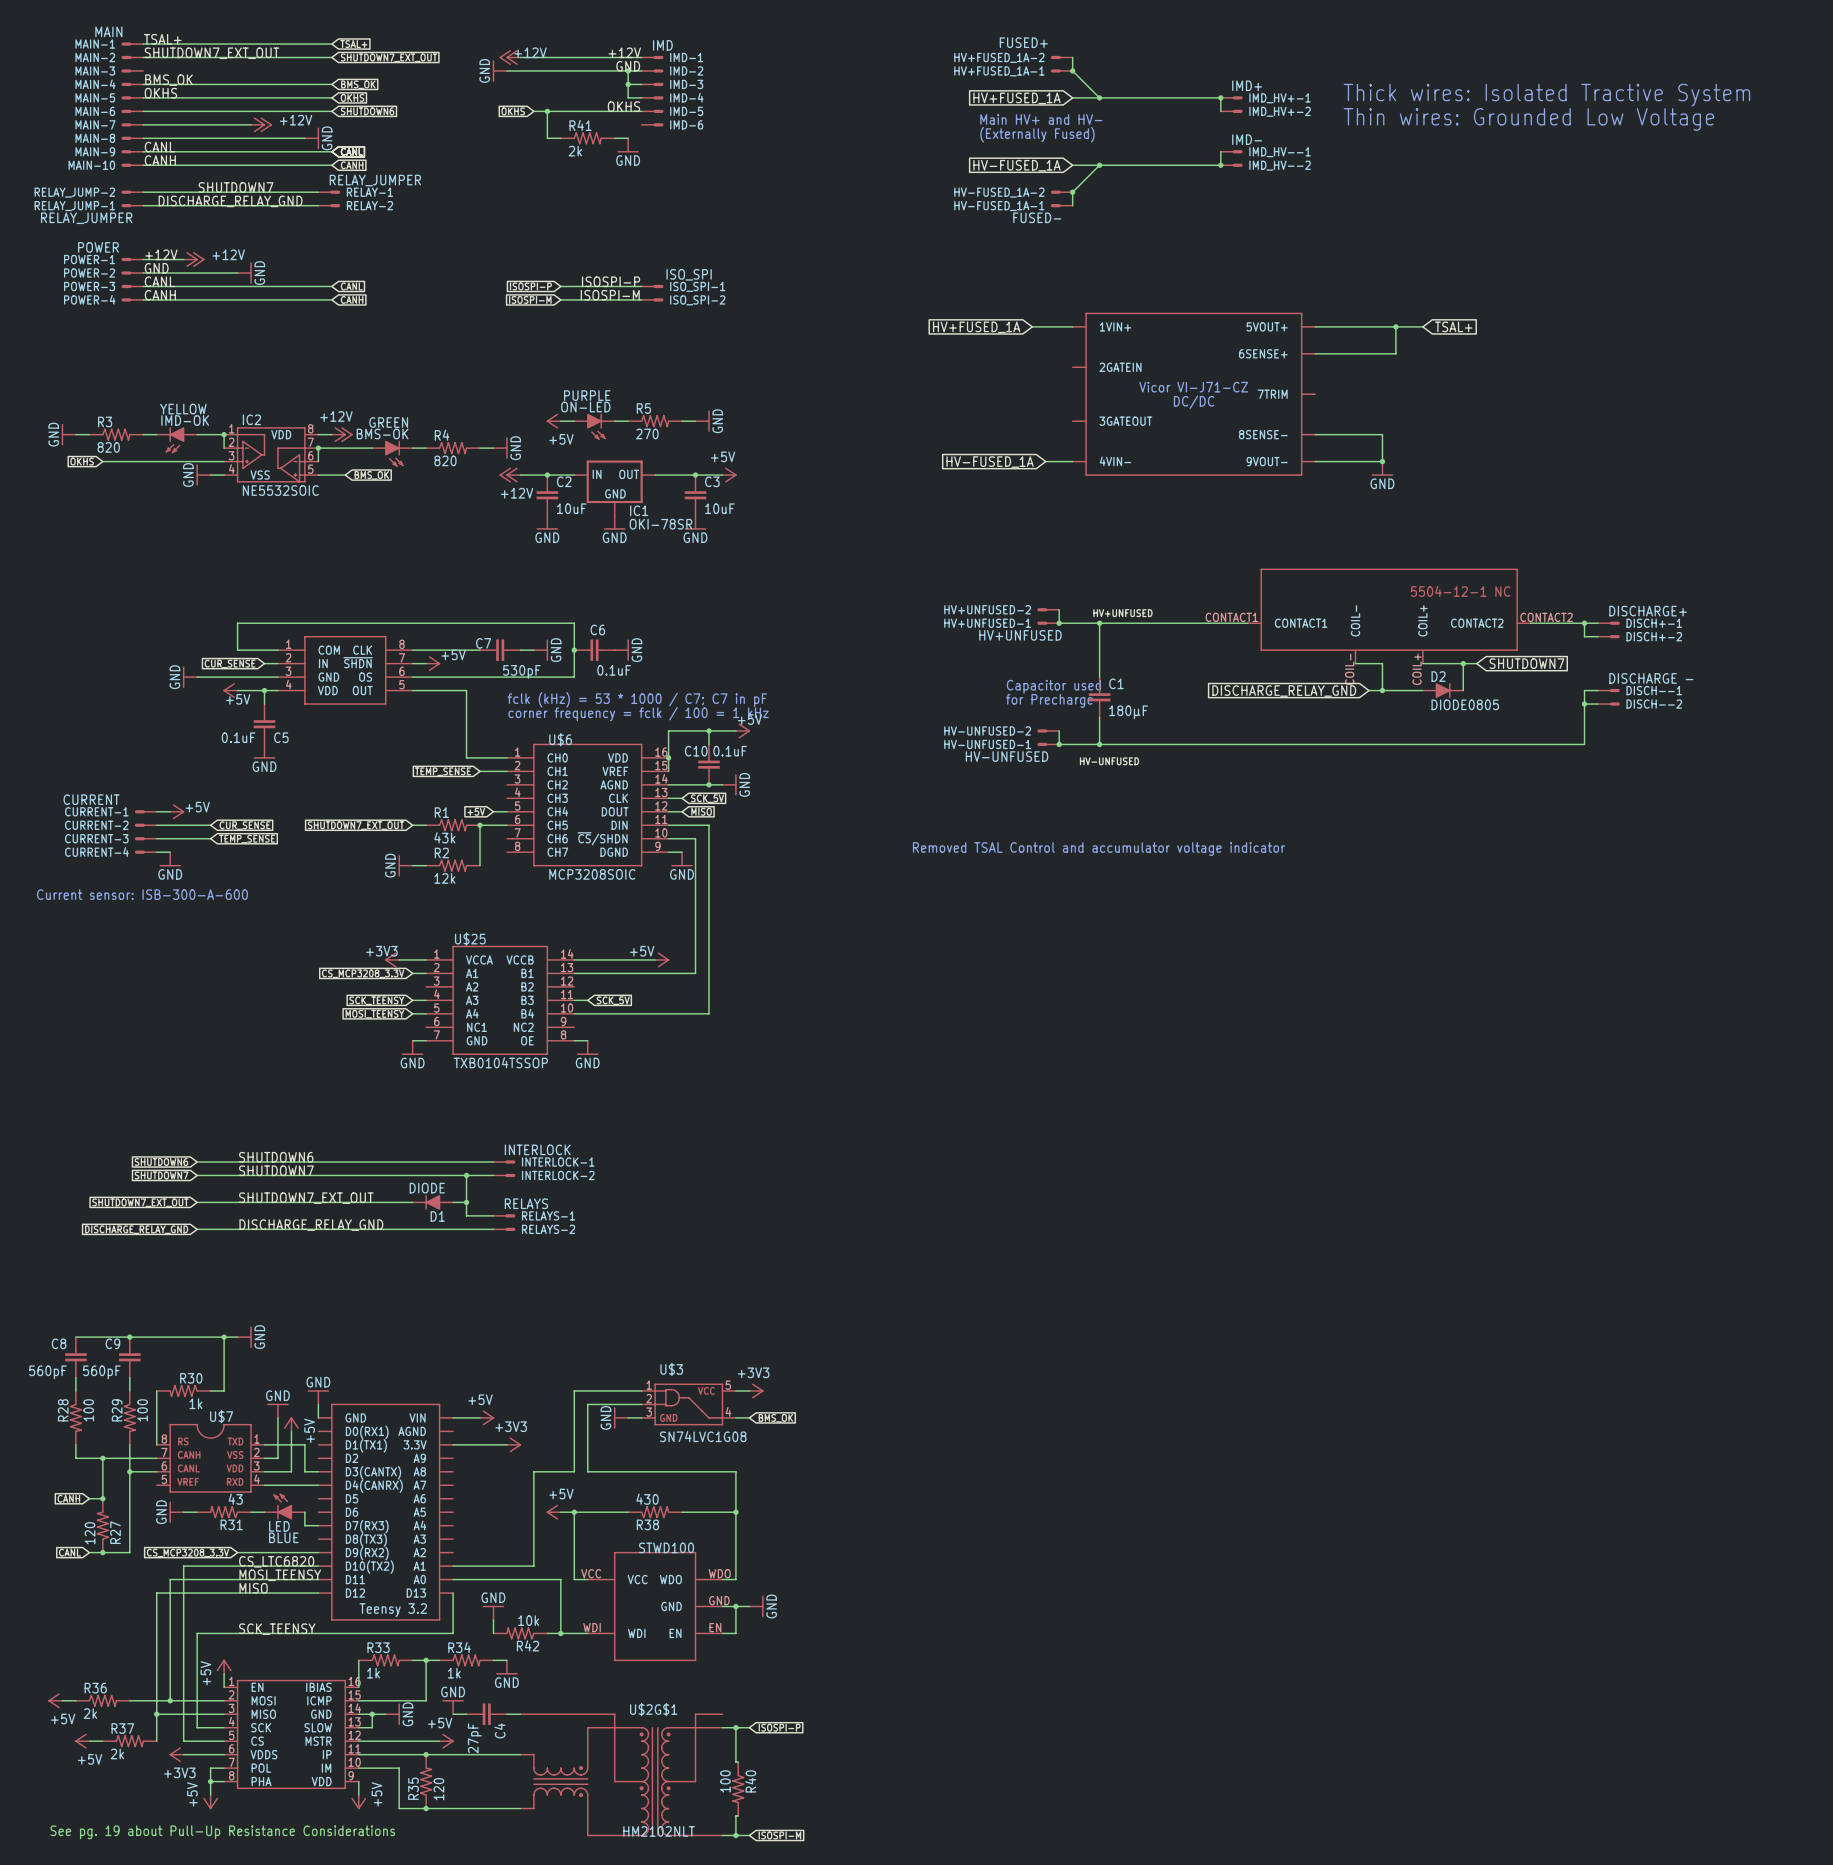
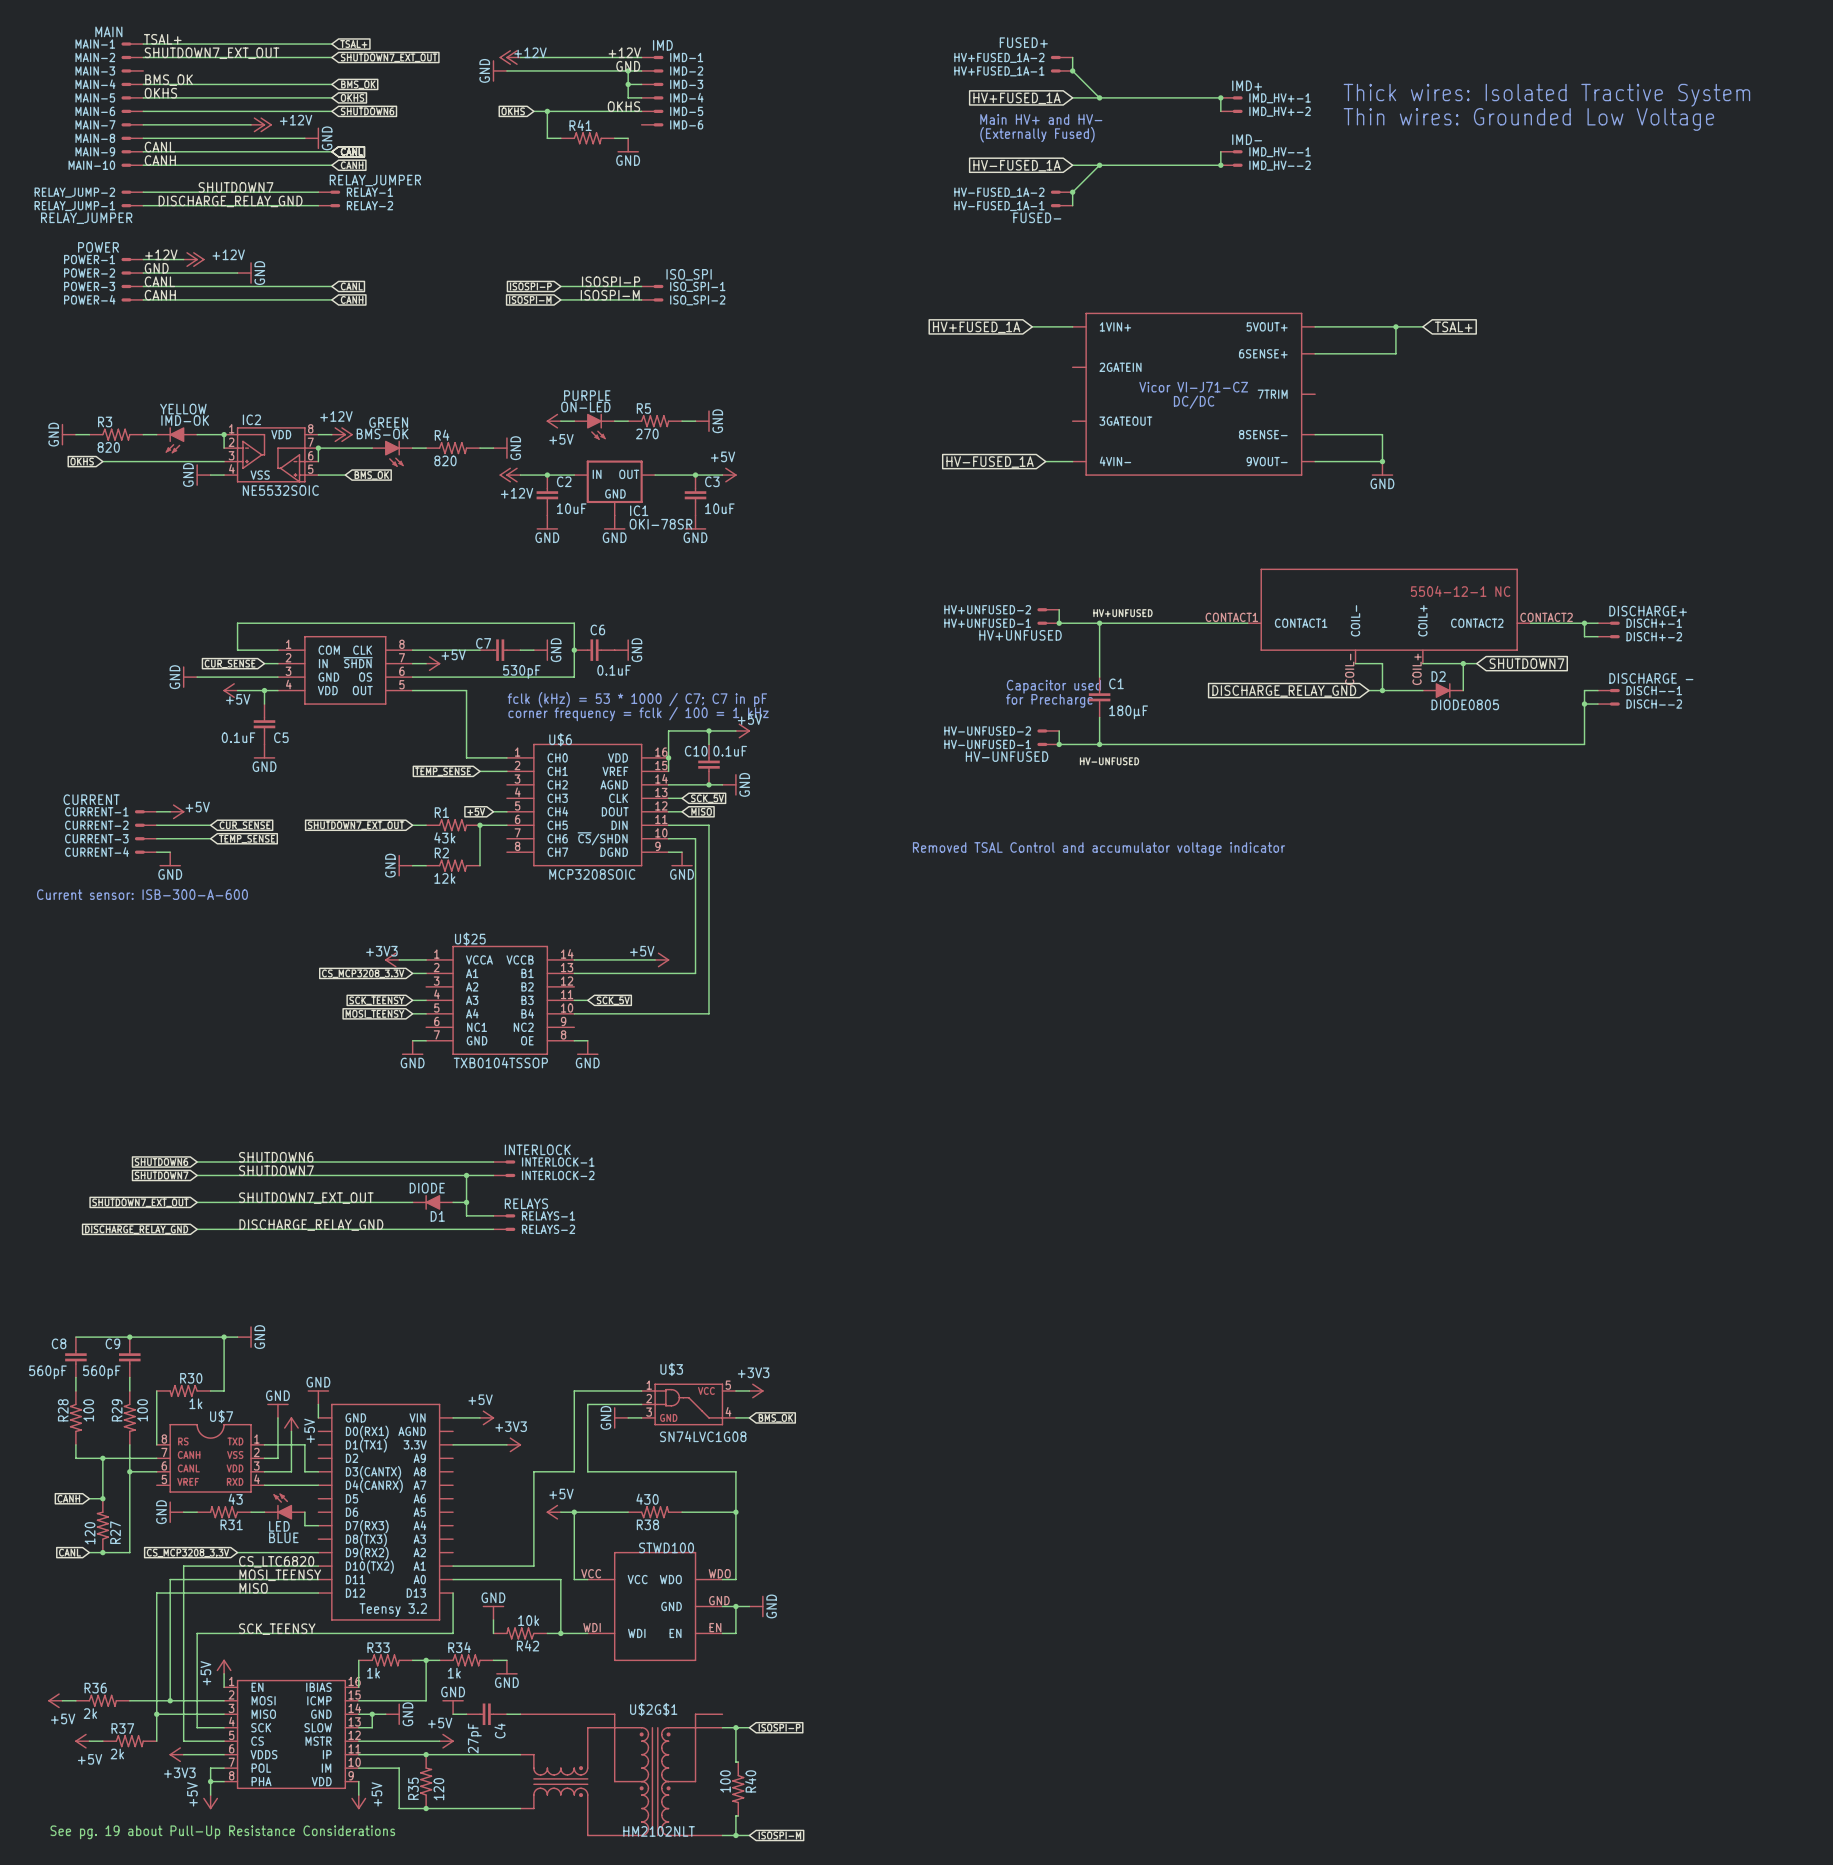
R41 value: 2k (575, 151) -> none

